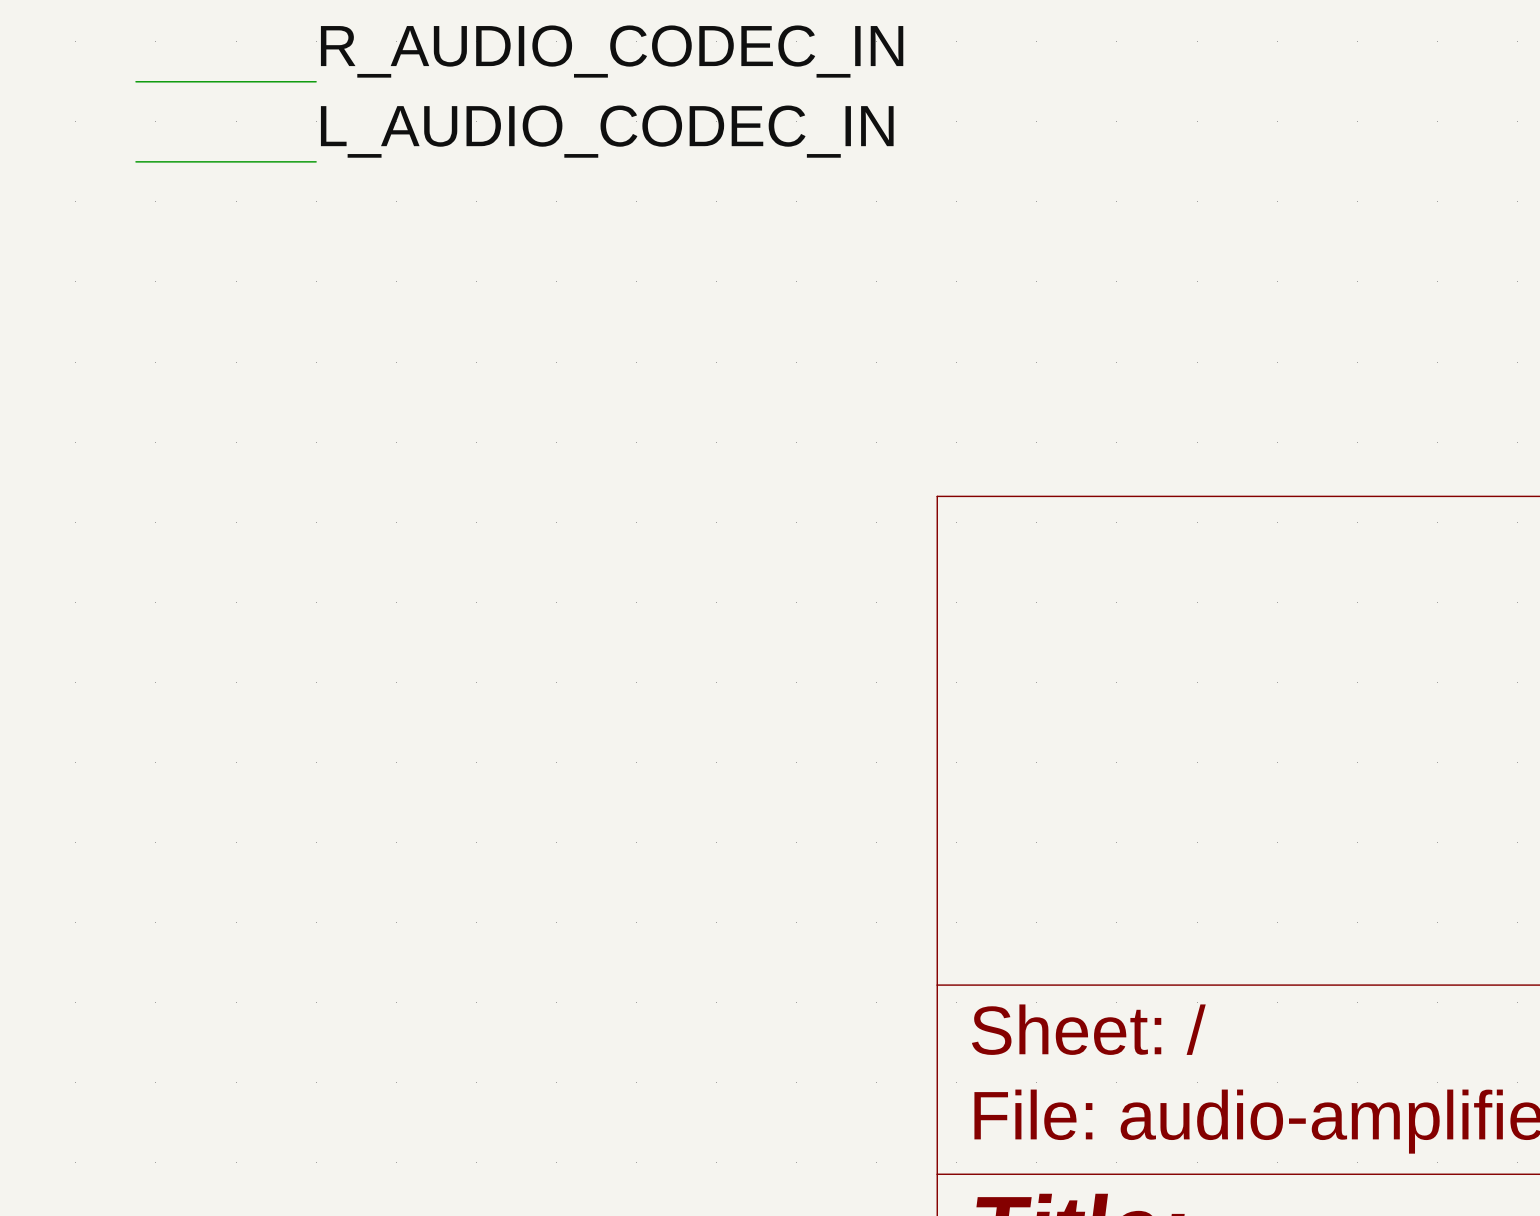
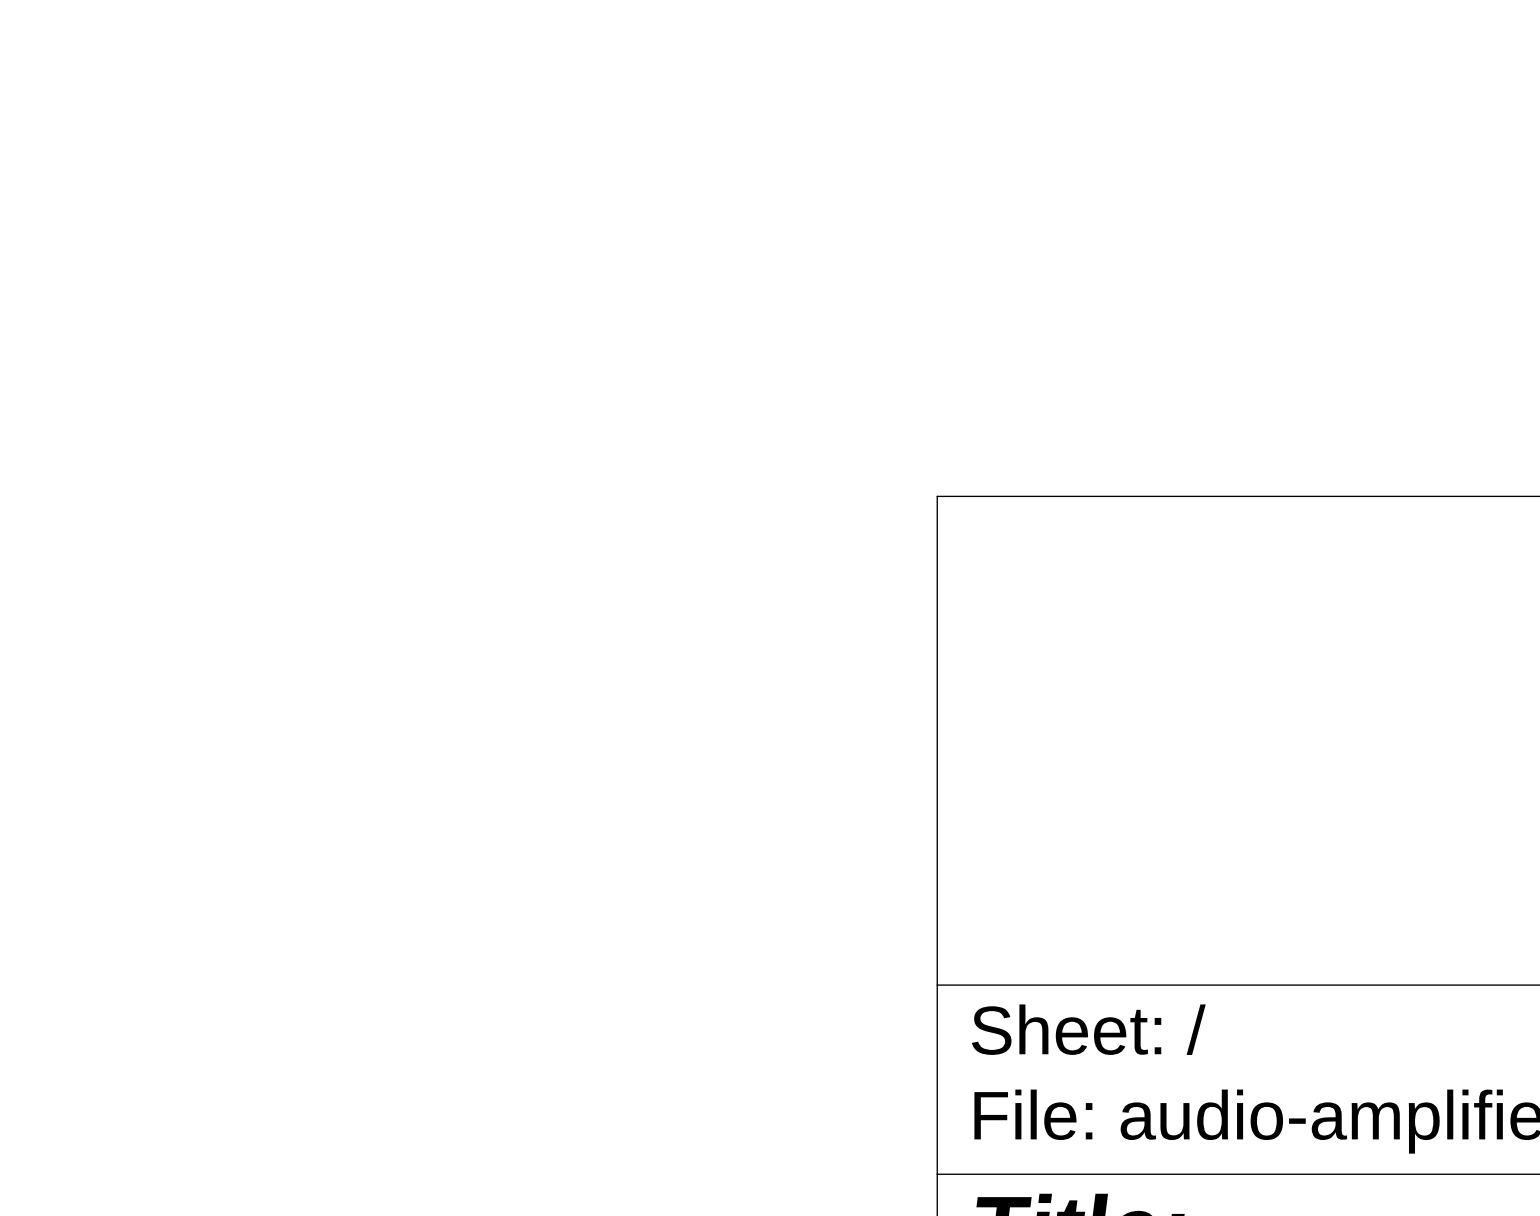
label: R_AUDIO_CODEC_IN (612, 51) -> none
wire: (135, 81) (316, 81) -> none
label: L_AUDIO_CODEC_IN (607, 131) -> none
wire: (135, 161) (316, 161) -> none

